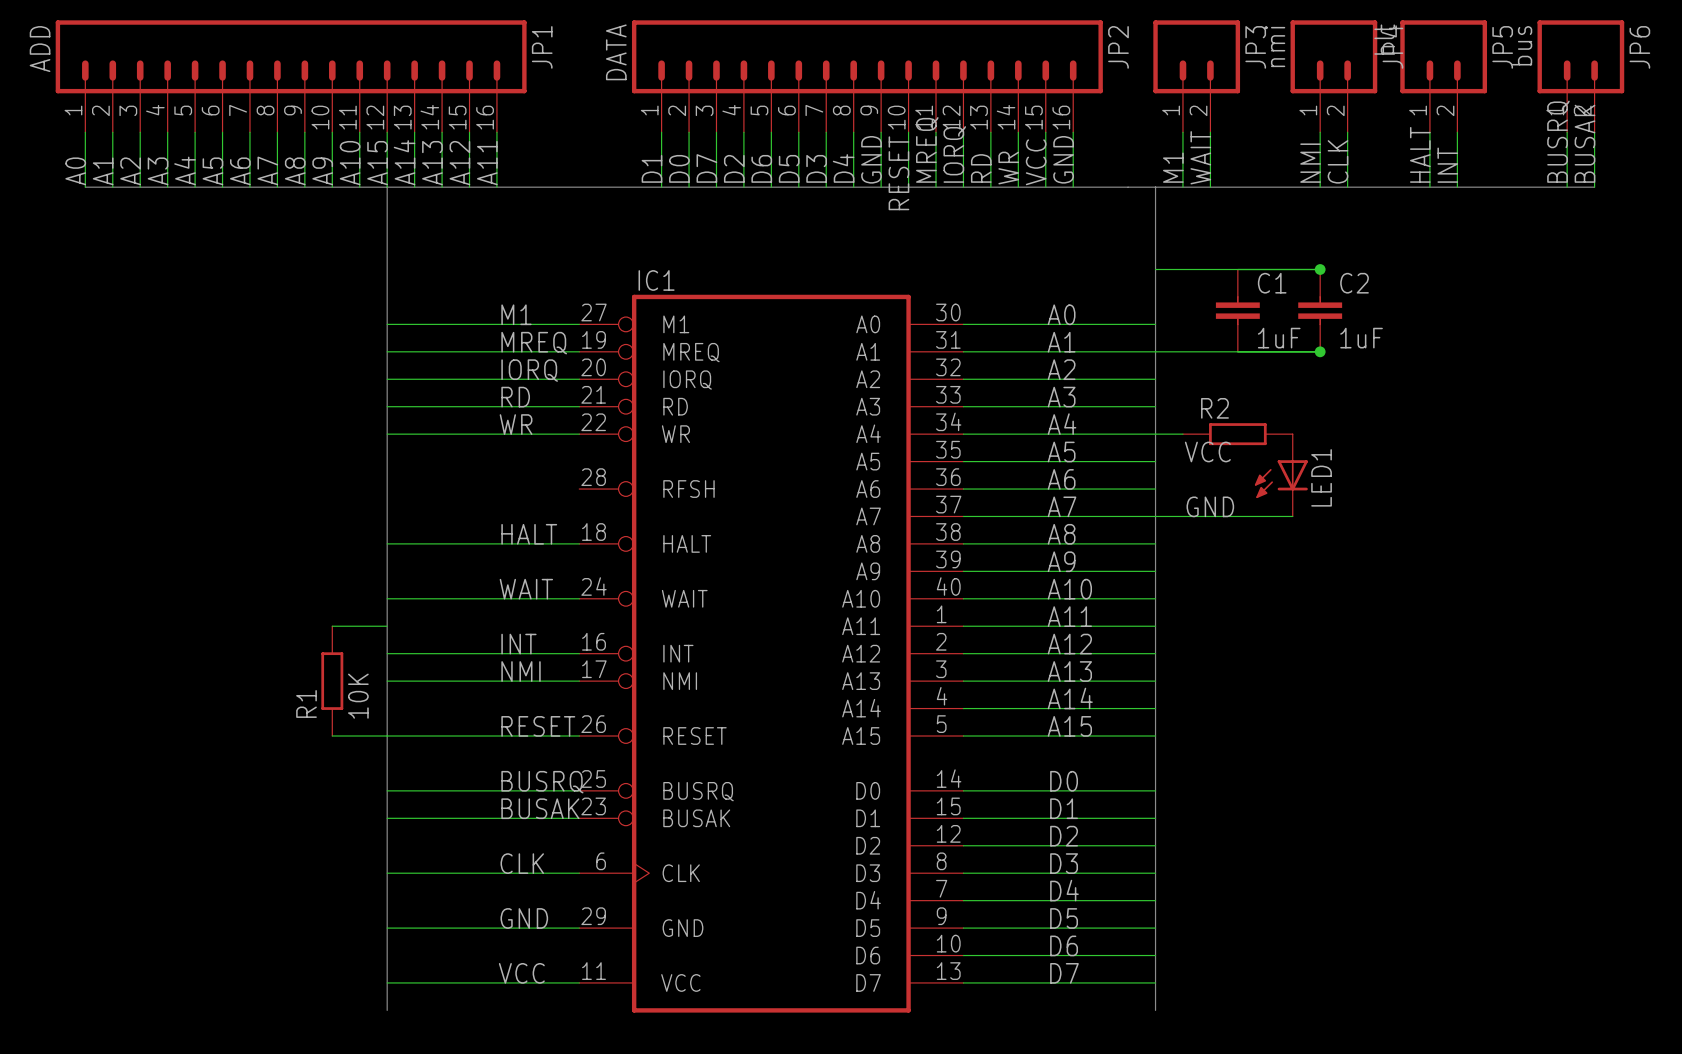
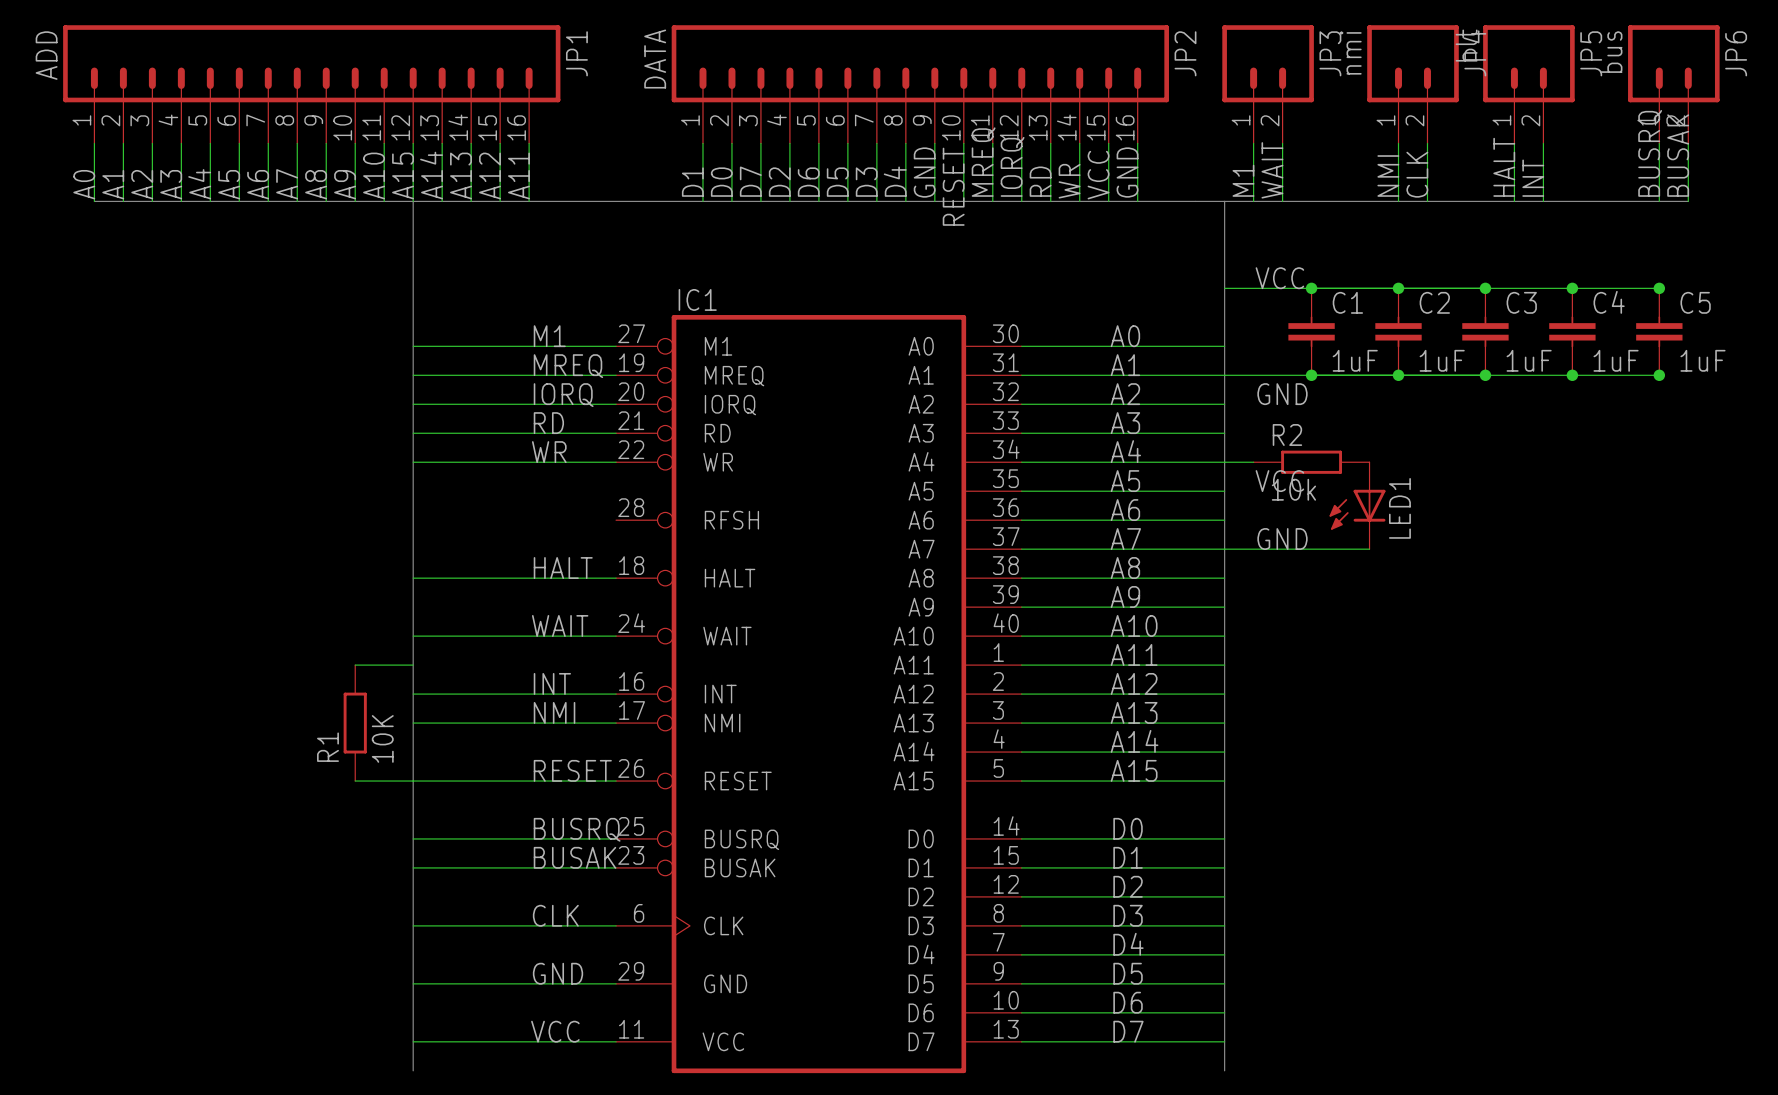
label: none -> VCC (1279, 278)
junction: none -> (1311, 288)
wire: none -> (1398, 288) (1659, 288)
junction: none -> (1485, 288)
junction: none -> (1572, 288)
junction: none -> (1659, 288)
C3: none -> 1uF (1485, 331)
C4: none -> 1uF (1572, 331)
C5: none -> 1uF (1659, 331)
junction: none -> (1311, 375)
wire: none -> (1398, 375) (1659, 375)
junction: none -> (1485, 375)
junction: none -> (1572, 375)
junction: none -> (1659, 375)
label: none -> GND (1282, 394)
R2 value: none -> 10k (1293, 489)

